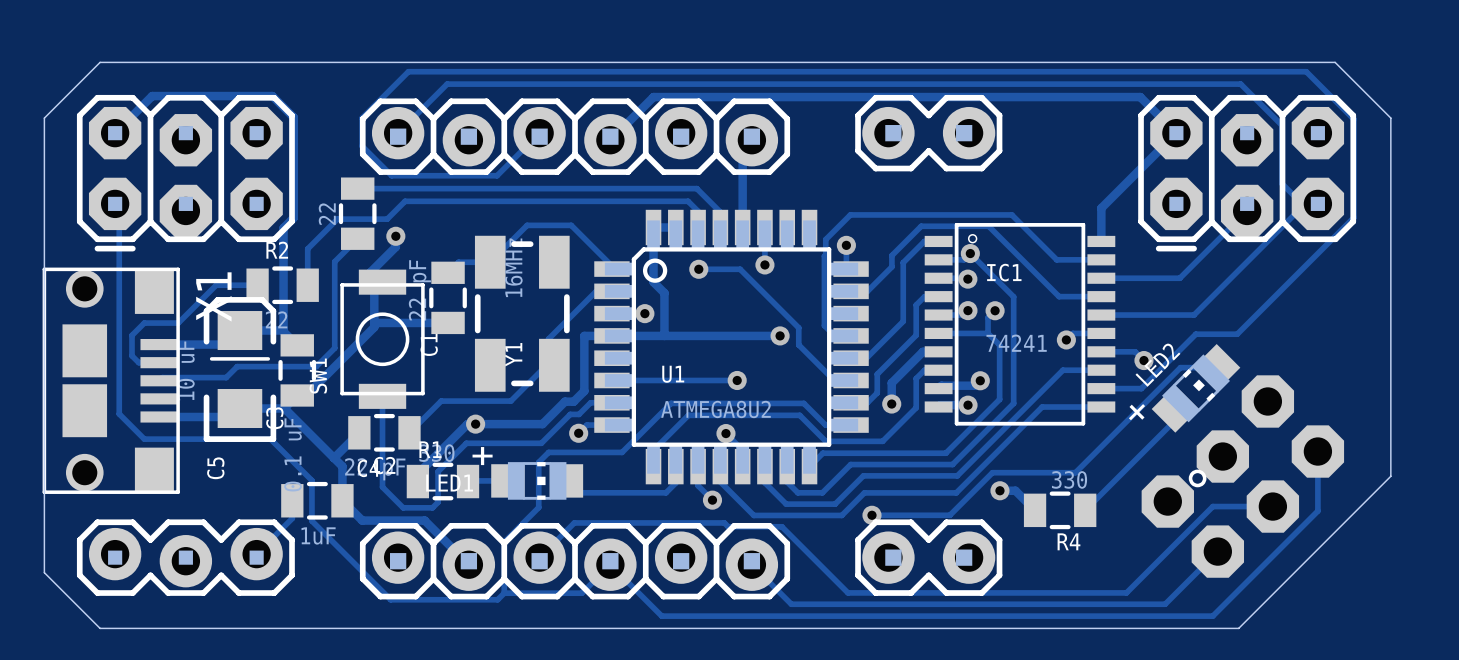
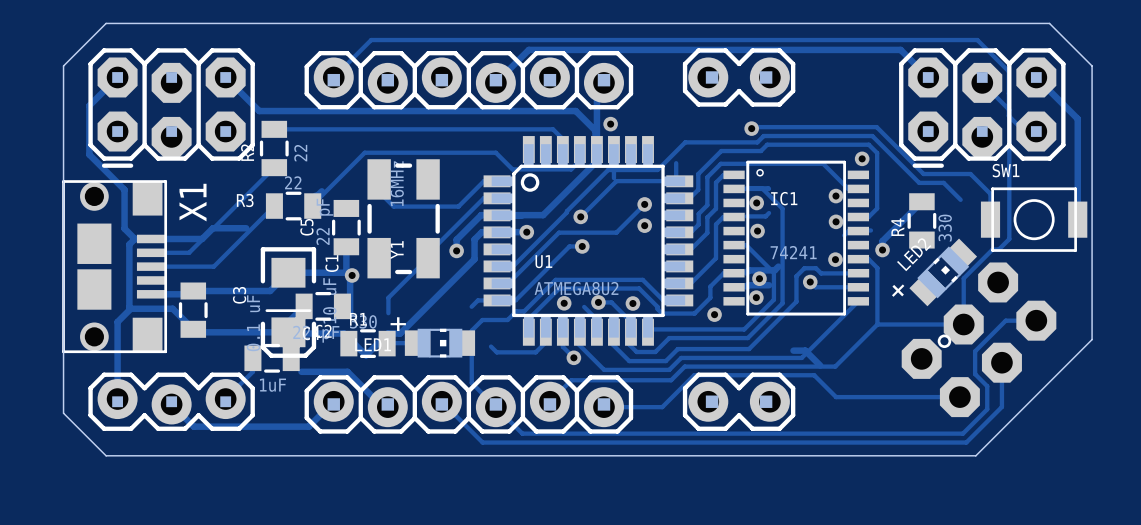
track: (115, 133) (152, 96) (272, 96) (293, 117) (293, 217) (283, 228) (283, 331) (297, 345) -> (117, 77) (89, 105) (89, 154) (124, 189) (124, 228) (134, 238)
track: none -> (225, 77) (259, 111) (575, 111) (595, 130) (595, 162) (543, 215) (481, 215) (456, 239) (456, 250)
track: (539, 133) (497, 175) (391, 175) (362, 146) (362, 118) (408, 71) (1306, 71) (1353, 119) (1353, 217) (1237, 334) (1195, 334) (1141, 388) (1101, 388) -> none
track: (1176, 133) (1101, 208) (1101, 241) -> none
track: none -> (1036, 77) (1077, 118) (1077, 219)
track: none -> (982, 82) (1009, 109) (1009, 239) (998, 249) (992, 249) (963, 278) (963, 324) (877, 324)
track: (357, 188) (696, 188) (720, 212) (720, 227) -> none
via: none -> (610, 124)
track: none -> (751, 128) (876, 127) (923, 174) (970, 174) (990, 193) (990, 219)
via: none -> (751, 128)
track: none -> (274, 129) (553, 129) (561, 137) (561, 149)
track: (115, 203) (119, 208) (119, 413) (144, 439) (270, 439) (311, 480) (311, 521) (390, 599) (497, 599) (504, 593) -> none
track: (1317, 203) (1302, 203) (1302, 206) (1194, 315) (1101, 315) -> none
track: (1247, 210) (1179, 278) (1101, 278) -> none
part: 22 (357, 213) -> none
track: (675, 227) (653, 227) (653, 282) (664, 293) (664, 335) -> none
track: (698, 227) (698, 211) (688, 201) (405, 201) (387, 219) (337, 219) (307, 248) (307, 285) -> none
track: none -> (578, 149) (578, 162) (571, 169) (512, 169) (495, 152) (364, 152) (312, 206)
track: (395, 236) (395, 246) (370, 272) (370, 283) (374, 287) (374, 327) (306, 395) (297, 395) (284, 408) (239, 408) (231, 416) (209, 416) -> (346, 272) (288, 272) (270, 291) (193, 291) (190, 294)
via: (395, 236) -> none
track: (357, 238) (334, 261) (334, 348) (316, 366) (237, 366) (226, 377) (162, 377) (159, 380) -> (274, 206) (213, 266) (151, 266)
via: none -> (862, 158)
track: (938, 241) (924, 241) (903, 262) (903, 321) (866, 358) (851, 358) -> none
via: (846, 245) -> none
via: (970, 253) -> none
track: (938, 259) (964, 259) (970, 253) (1013, 296) (1013, 403) (952, 464) (850, 464) (822, 492) (797, 492) (787, 482) (787, 466) -> none
track: (1101, 259) (1056, 259) (1011, 214) (850, 214) (825, 239) (824, 325) (834, 335) (851, 335) -> none
track: none -> (734, 174) (723, 174) (716, 182) (716, 208) (707, 217) (707, 232) (691, 249) (678, 249)
via: (764, 264) -> none
track: none -> (379, 179) (379, 191) (393, 206) (458, 206) (484, 181) (495, 181)
track: none -> (678, 181) (616, 181) (580, 216)
track: (611, 269) (611, 266) (571, 225) (527, 225) (490, 262) (458, 262) (448, 272) -> none
track: (698, 269) (740, 269) (798, 327) (798, 344) (834, 380) (851, 380) -> none
via: (698, 269) -> none
track: none -> (734, 188) (762, 188) (782, 208) (782, 303) (747, 338) (669, 338) (655, 352) (636, 352) (629, 344) (629, 320) (611, 302) (598, 302)
via: (967, 279) -> none
track: none -> (858, 188) (848, 188) (823, 163) (720, 163) (707, 177) (707, 205) (698, 213) (698, 224) (691, 232) (678, 232)
track: (257, 285) (216, 285) (178, 323) (144, 323) (131, 335) (131, 355) (138, 362) (159, 362) -> (274, 167) (189, 252) (151, 252)
R2 rotation: 0° (282, 285) -> 90° clockwise (274, 148)
R2 position: (282, 285) -> (274, 148)
via: none -> (835, 196)
track: none -> (495, 198) (483, 198) (428, 253) (428, 258) (388, 297) (388, 313)
track: (611, 291) (596, 291) (548, 338) (548, 363) -> none
track: none -> (678, 198) (689, 198) (698, 189) (698, 174) (721, 151) (760, 151) (767, 144) (868, 144) (877, 153) (877, 208) (868, 217) (858, 217)
track: (851, 291) (867, 291) (891, 266) (891, 255) (921, 226) (988, 226) (1059, 296) (1101, 296) -> none
track: none -> (960, 199) (943, 182) (919, 182) (872, 136) (763, 136) (757, 142) (685, 142) (657, 170) (608, 170) (513, 266) (495, 266)
track: none -> (921, 201) (882, 241) (882, 250)
track: (938, 296) (924, 296) (916, 305) (916, 335) (877, 374) (877, 392) (867, 402) (851, 402) -> none
C1 position: (448, 297) -> (346, 227)
via: none -> (756, 202)
track: none -> (644, 204) (616, 232) (558, 232) (508, 283) (495, 283)
via: none -> (644, 204)
R3: none -> 22 (293, 206)
via: (967, 310) -> none
track: (995, 310) (988, 317) (988, 333) -> none
via: (995, 310) -> none
Y1 position: (522, 313) -> (403, 218)
via position: (644, 313) -> (526, 232)
via: none -> (580, 216)
track: none -> (734, 217) (723, 217) (716, 224) (716, 258) (691, 283) (678, 283)
track: (374, 322) (448, 322) -> none
IC1 position: (1019, 324) -> (796, 238)
via: none -> (644, 225)
track: (938, 333) (988, 333) -> none
track: (988, 333) (999, 345) (999, 399) (945, 453) (822, 453) (809, 466) -> none
via: none -> (757, 231)
track: none -> (526, 232) (481, 232) (474, 239) (474, 259) (400, 333) (387, 333) (366, 355) (344, 333) (196, 332) (172, 308) (130, 308)
track: (780, 335) (584, 335) (584, 391) (573, 401) (564, 401) (542, 424) (467, 424) (417, 473) (417, 481) -> none
via: (780, 335) -> none
SW1 rotation: 0° (382, 339) -> 90° clockwise (1034, 219)
SW1 position: (382, 339) -> (1034, 219)
via position: (1066, 339) -> (836, 221)
track: none -> (134, 238) (129, 244) (130, 308)
track: (938, 351) (922, 351) (891, 383) (891, 404) -> none
track: (1101, 351) (1135, 351) (1143, 360) -> none
track: none -> (734, 245) (746, 245) (773, 272) (773, 299) (744, 329) (646, 329)
track: none -> (346, 246) (346, 272)
track: none -> (582, 246) (569, 246) (515, 300) (495, 300)
via: none -> (582, 246)
via: none -> (882, 250)
via: none -> (456, 250)
via: (1143, 360) -> none
track: (548, 363) (510, 401) (441, 401) (409, 432) -> none
track: (1216, 367) (1180, 367) (1075, 472) (992, 472) (949, 515) (871, 515) -> none
C5 rotation: 0° (239, 369) -> 180° (288, 302)
C5 position: (239, 369) -> (288, 302)
C3 position: (297, 370) -> (193, 310)
track: (938, 370) (924, 370) (916, 378) (916, 407) (882, 441) (825, 441) (799, 415) (688, 415) (653, 450) (653, 466) -> none
track: (1101, 370) (1062, 370) (957, 475) (863, 475) (835, 504) (786, 504) (764, 482) (764, 466) -> none
via: none -> (835, 259)
track: none -> (858, 259) (868, 259) (877, 268) (877, 324)
track: (611, 380) (737, 380) -> none
via: (737, 380) -> none
via: (980, 380) -> none
track: none -> (733, 273) (723, 273) (710, 286) (710, 297) (694, 313) (662, 313) (639, 288) (559, 288) (527, 320) (527, 332)
track: none -> (858, 273) (821, 273) (815, 268) (804, 268) (796, 276) (796, 301) (749, 349) (677, 349) (665, 361) (629, 361) (612, 344) (612, 332)
via: none -> (352, 275)
track: none -> (350, 276) (350, 313)
track: (382, 396) (382, 487) (403, 507) (432, 507) (438, 502) (438, 471) (466, 443) (541, 443) (570, 414) (579, 414) (590, 402) (611, 402) -> none
via: none -> (759, 278)
track: none -> (810, 282) (815, 287) (858, 287)
via: none -> (810, 282)
via: (891, 404) -> none
via: (968, 405) -> none
track: (1101, 407) (1042, 407) (956, 492) (864, 492) (841, 515) (753, 515) (720, 481) (720, 466) -> none
track: (284, 408) (342, 466) (342, 500) (362, 520) (424, 520) (468, 564) -> (301, 371) (347, 371) (382, 407) (387, 407)
track: (1175, 409) (1175, 420) (1085, 510) -> none
via: none -> (756, 297)
via: (475, 424) -> none
track: (851, 425) (825, 425) (803, 403) (671, 403) (622, 452) (548, 452) (538, 462) (538, 507) (504, 542) (504, 593) -> none
track: none -> (858, 301) (801, 357) (681, 357) (669, 369) (604, 369) (578, 344) (578, 332)
via: none -> (564, 303)
via: none -> (632, 303)
via: (578, 433) -> none
via position: (725, 433) -> (598, 302)
track: none -> (130, 308) (117, 322) (117, 399)
via: none -> (714, 314)
track: (1317, 451) (1317, 511) (1212, 616) (661, 616) (645, 599) -> (1036, 320) (1005, 320) (975, 351) (975, 374) (987, 386) (987, 409) (962, 433) (522, 433)
track: none -> (877, 324) (835, 366) (684, 366) (671, 380) (571, 380) (549, 401)
track: none -> (544, 332) (544, 343) (535, 352) (496, 352) (491, 346)
track: (675, 466) (675, 483) (665, 492) (578, 492) (566, 480) -> none
via: (999, 490) -> none
track: (1272, 506) (1212, 506) (1126, 592) (848, 592) (781, 526) (728, 526) (724, 522) (574, 522) (539, 557) -> (1001, 362) (1001, 406) (966, 442) (482, 442) (441, 401)
R4 rotation: 0° (1060, 510) -> 90° clockwise (921, 220)
R4 position: (1060, 510) -> (921, 220)
via: (871, 515) -> none
track: (1217, 551) (1165, 604) (791, 604) (751, 564) -> (959, 397) (836, 397) (814, 375) (694, 375) (662, 407) (603, 407)
track: none -> (333, 401) (308, 426) (193, 426) (171, 404)
track: (610, 564) (581, 593) (504, 593) -> (495, 407) (471, 383) (471, 330) (482, 320) (507, 320) (516, 311) (524, 311) (555, 279) (642, 279) (663, 300) (678, 300)

